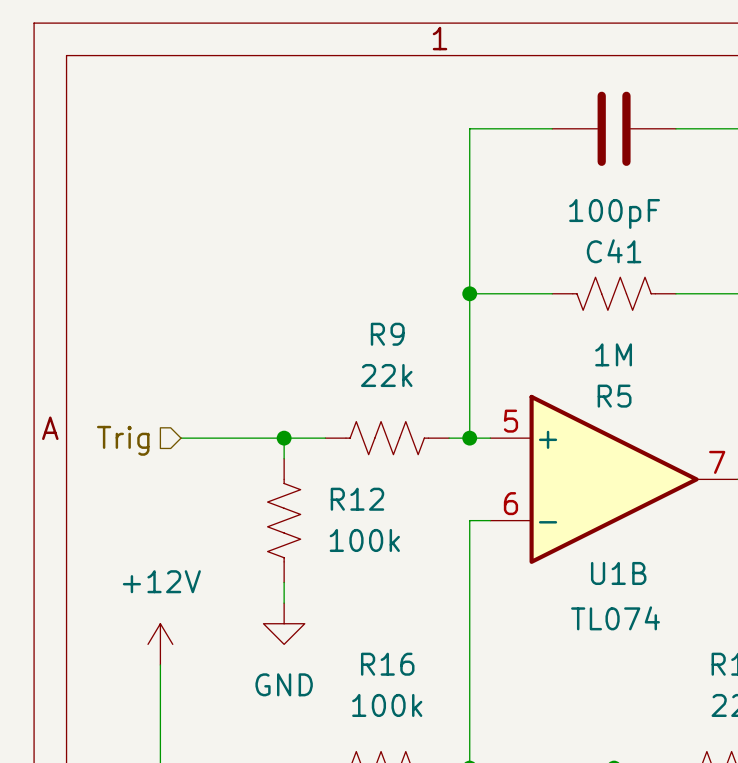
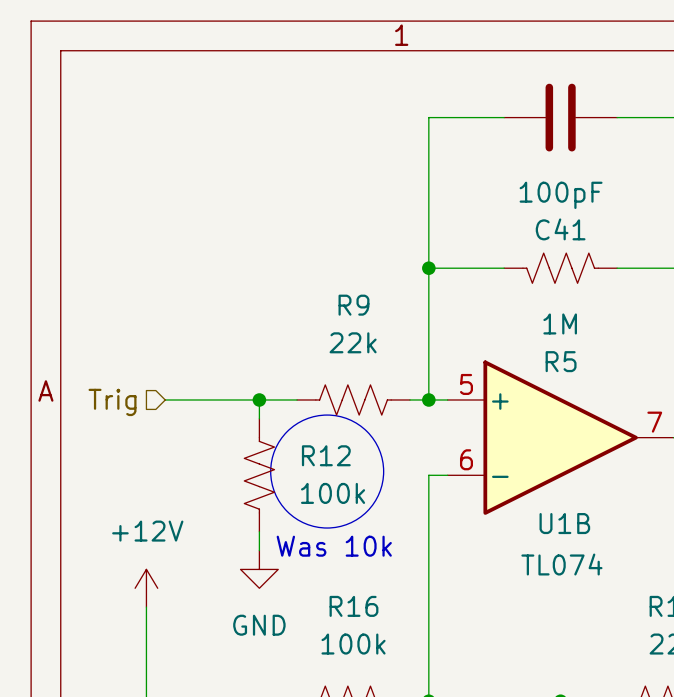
drawing: none -> [270, 415, 384, 529]
text: none -> Was 10k (334, 546)

